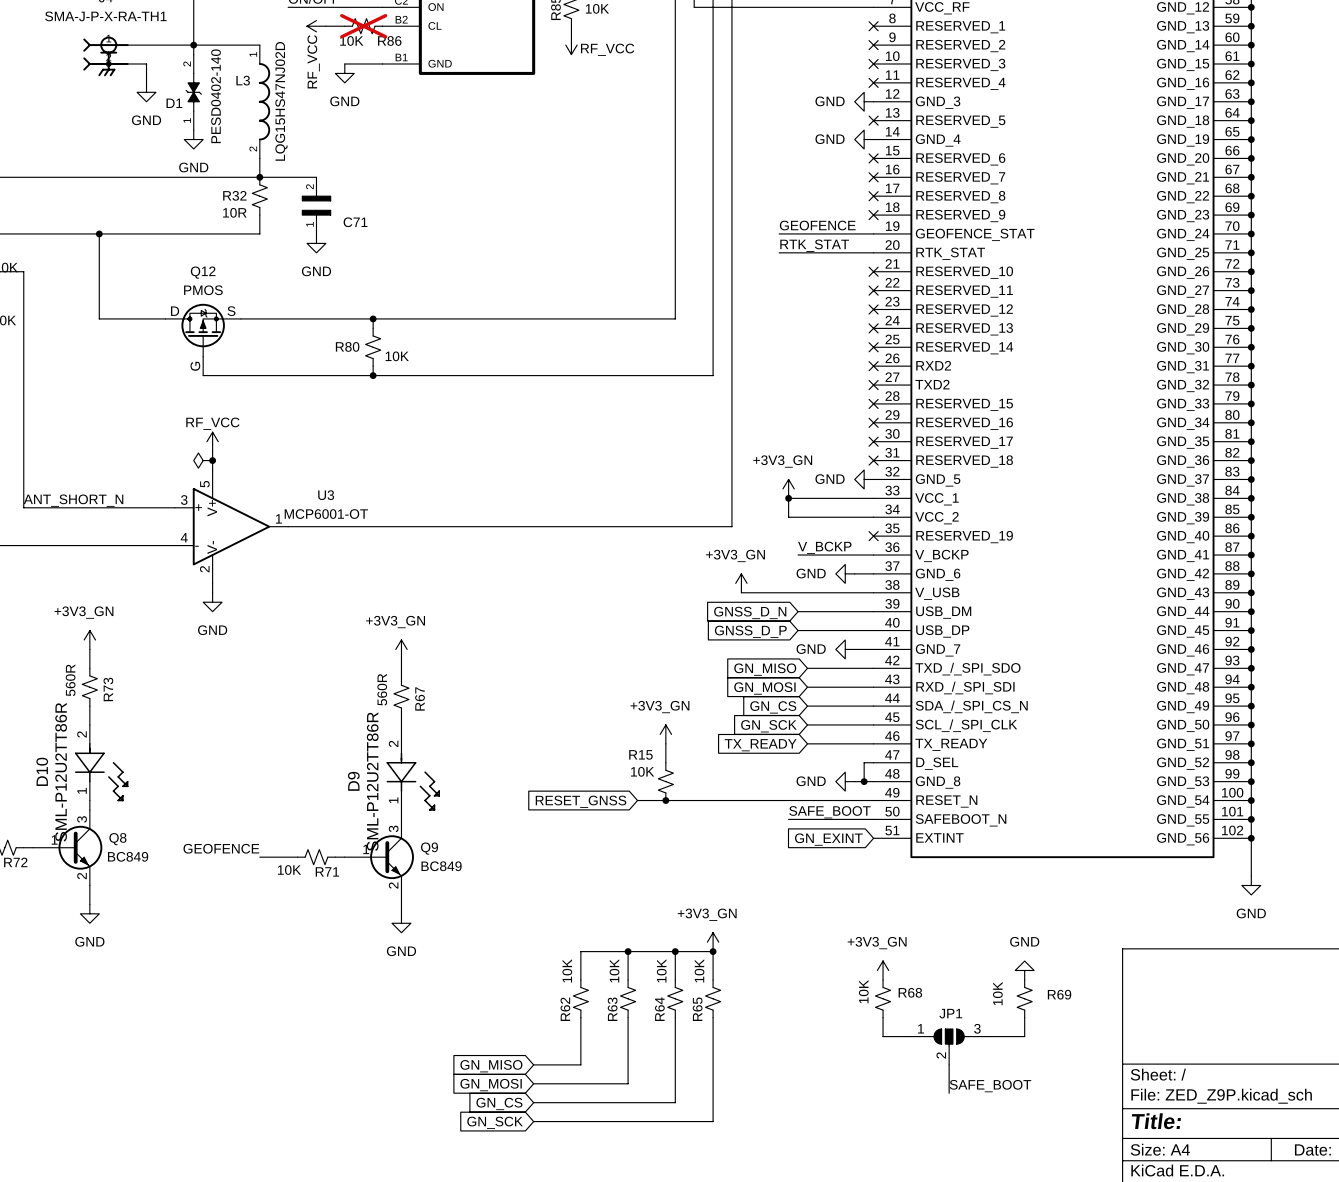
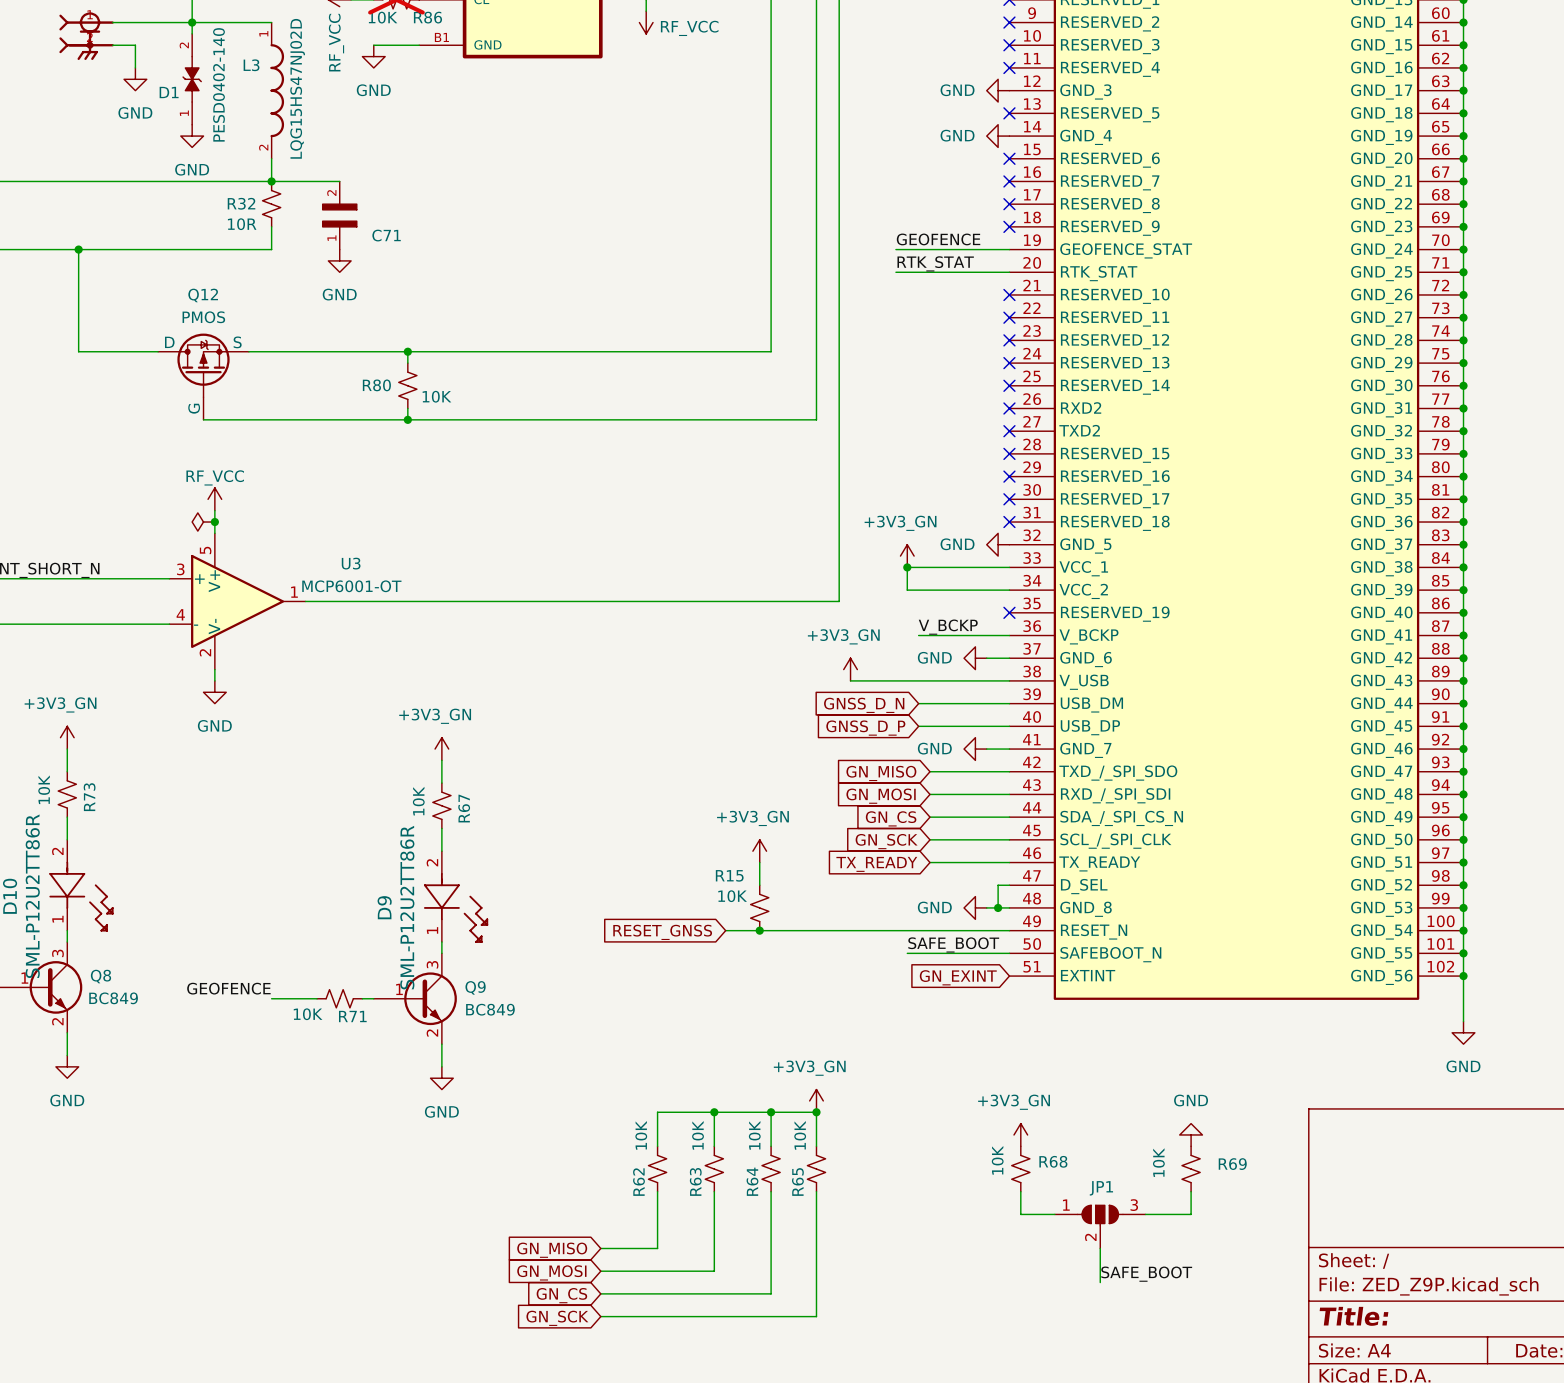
R73 value: 560R (70, 680) -> 10K (44, 789)
R67 value: 560R (382, 689) -> 10K (418, 801)

